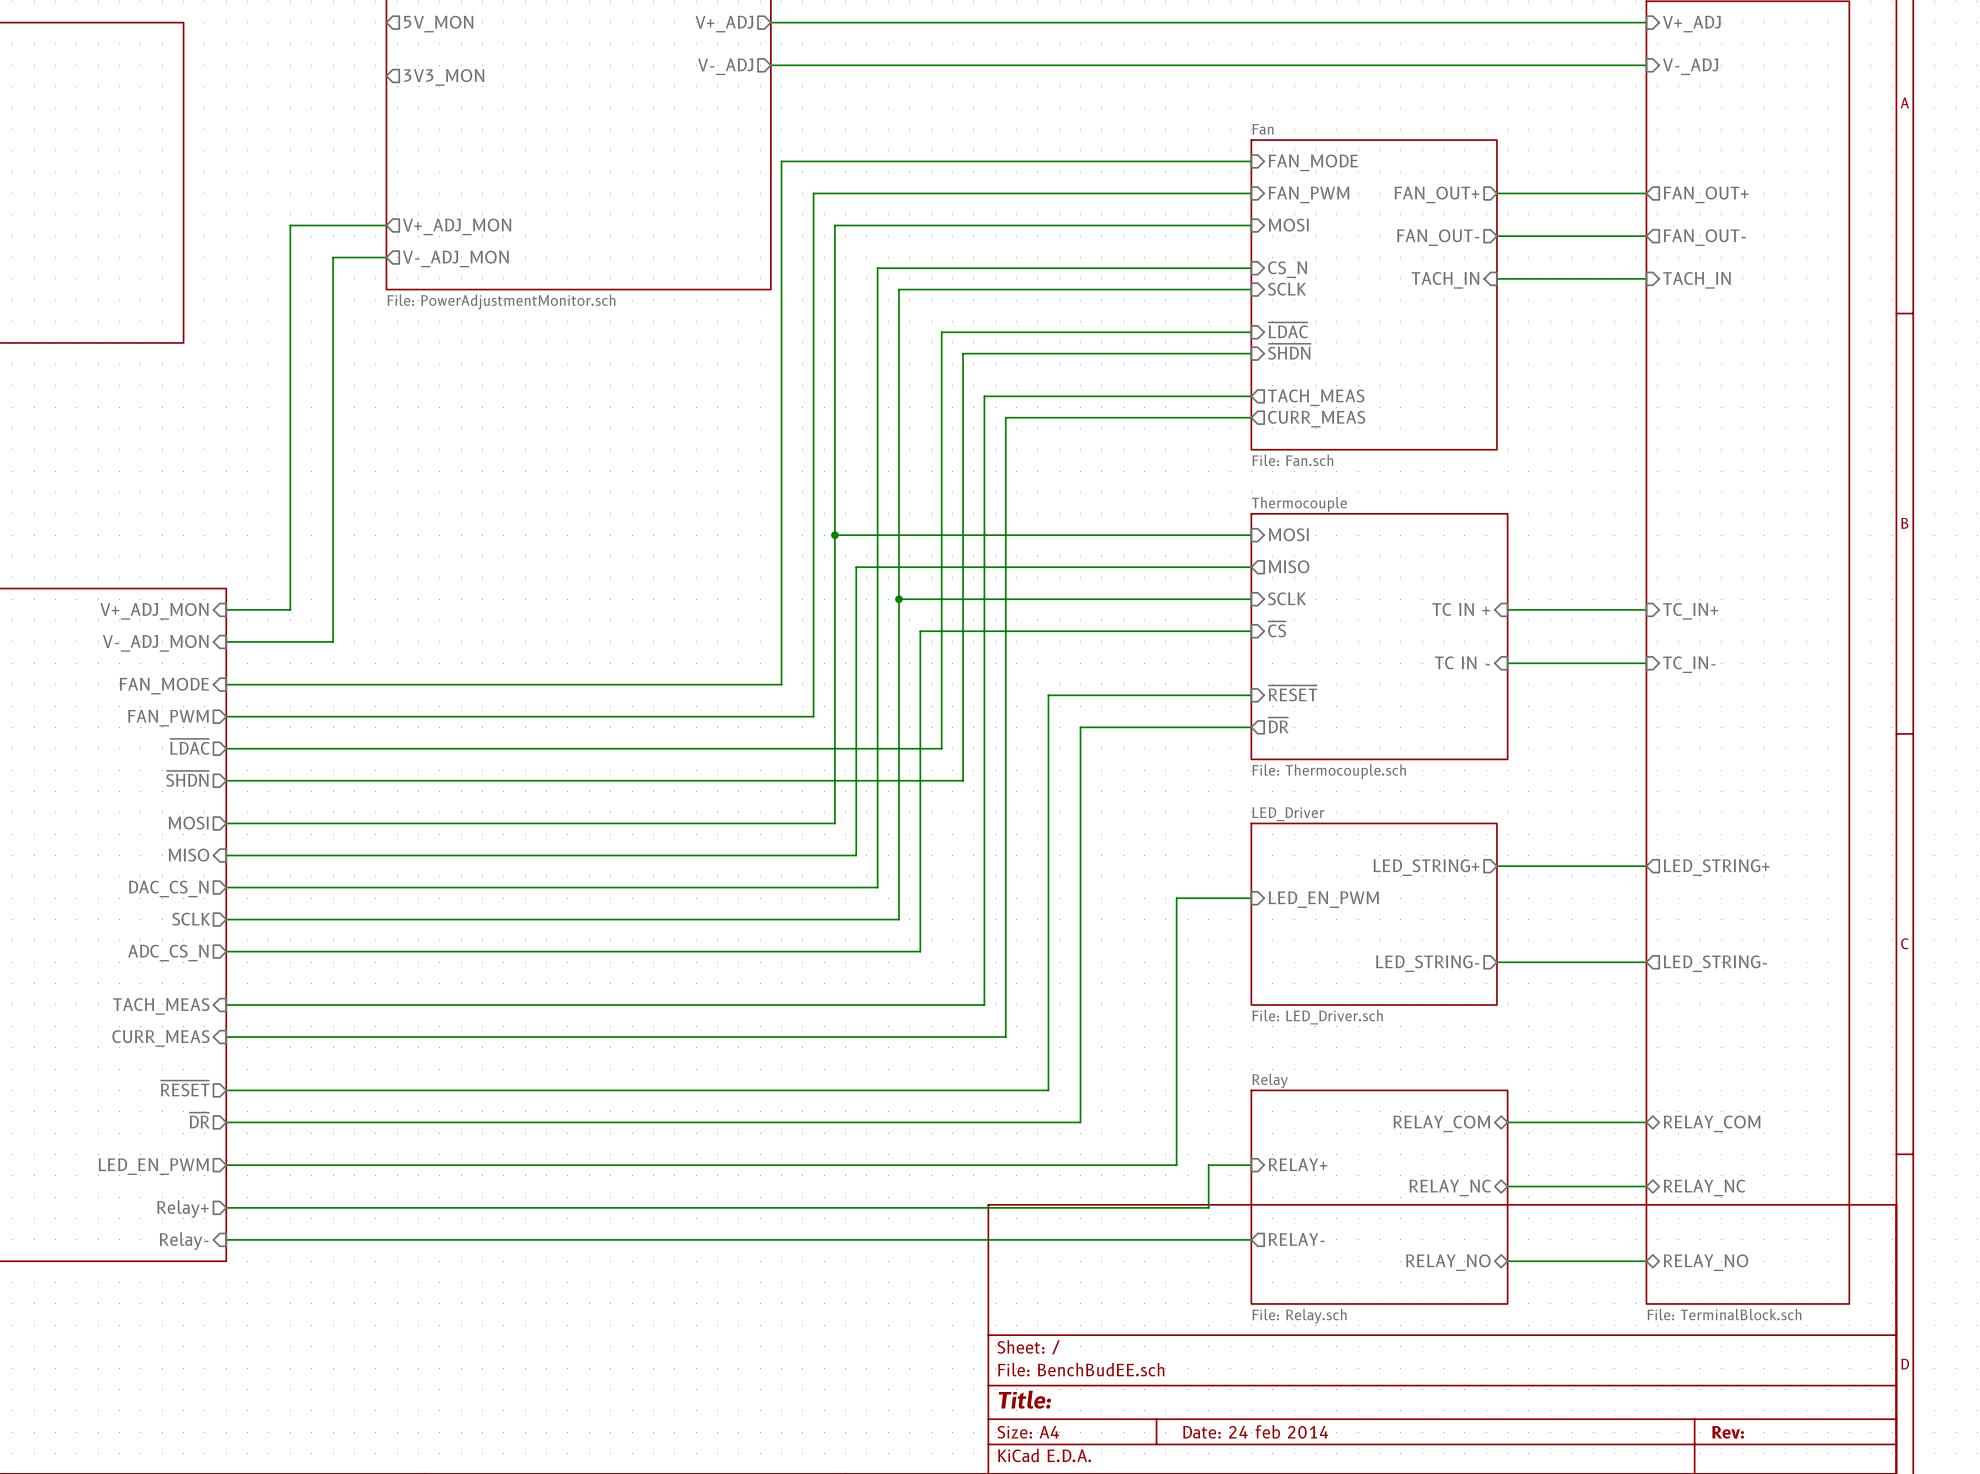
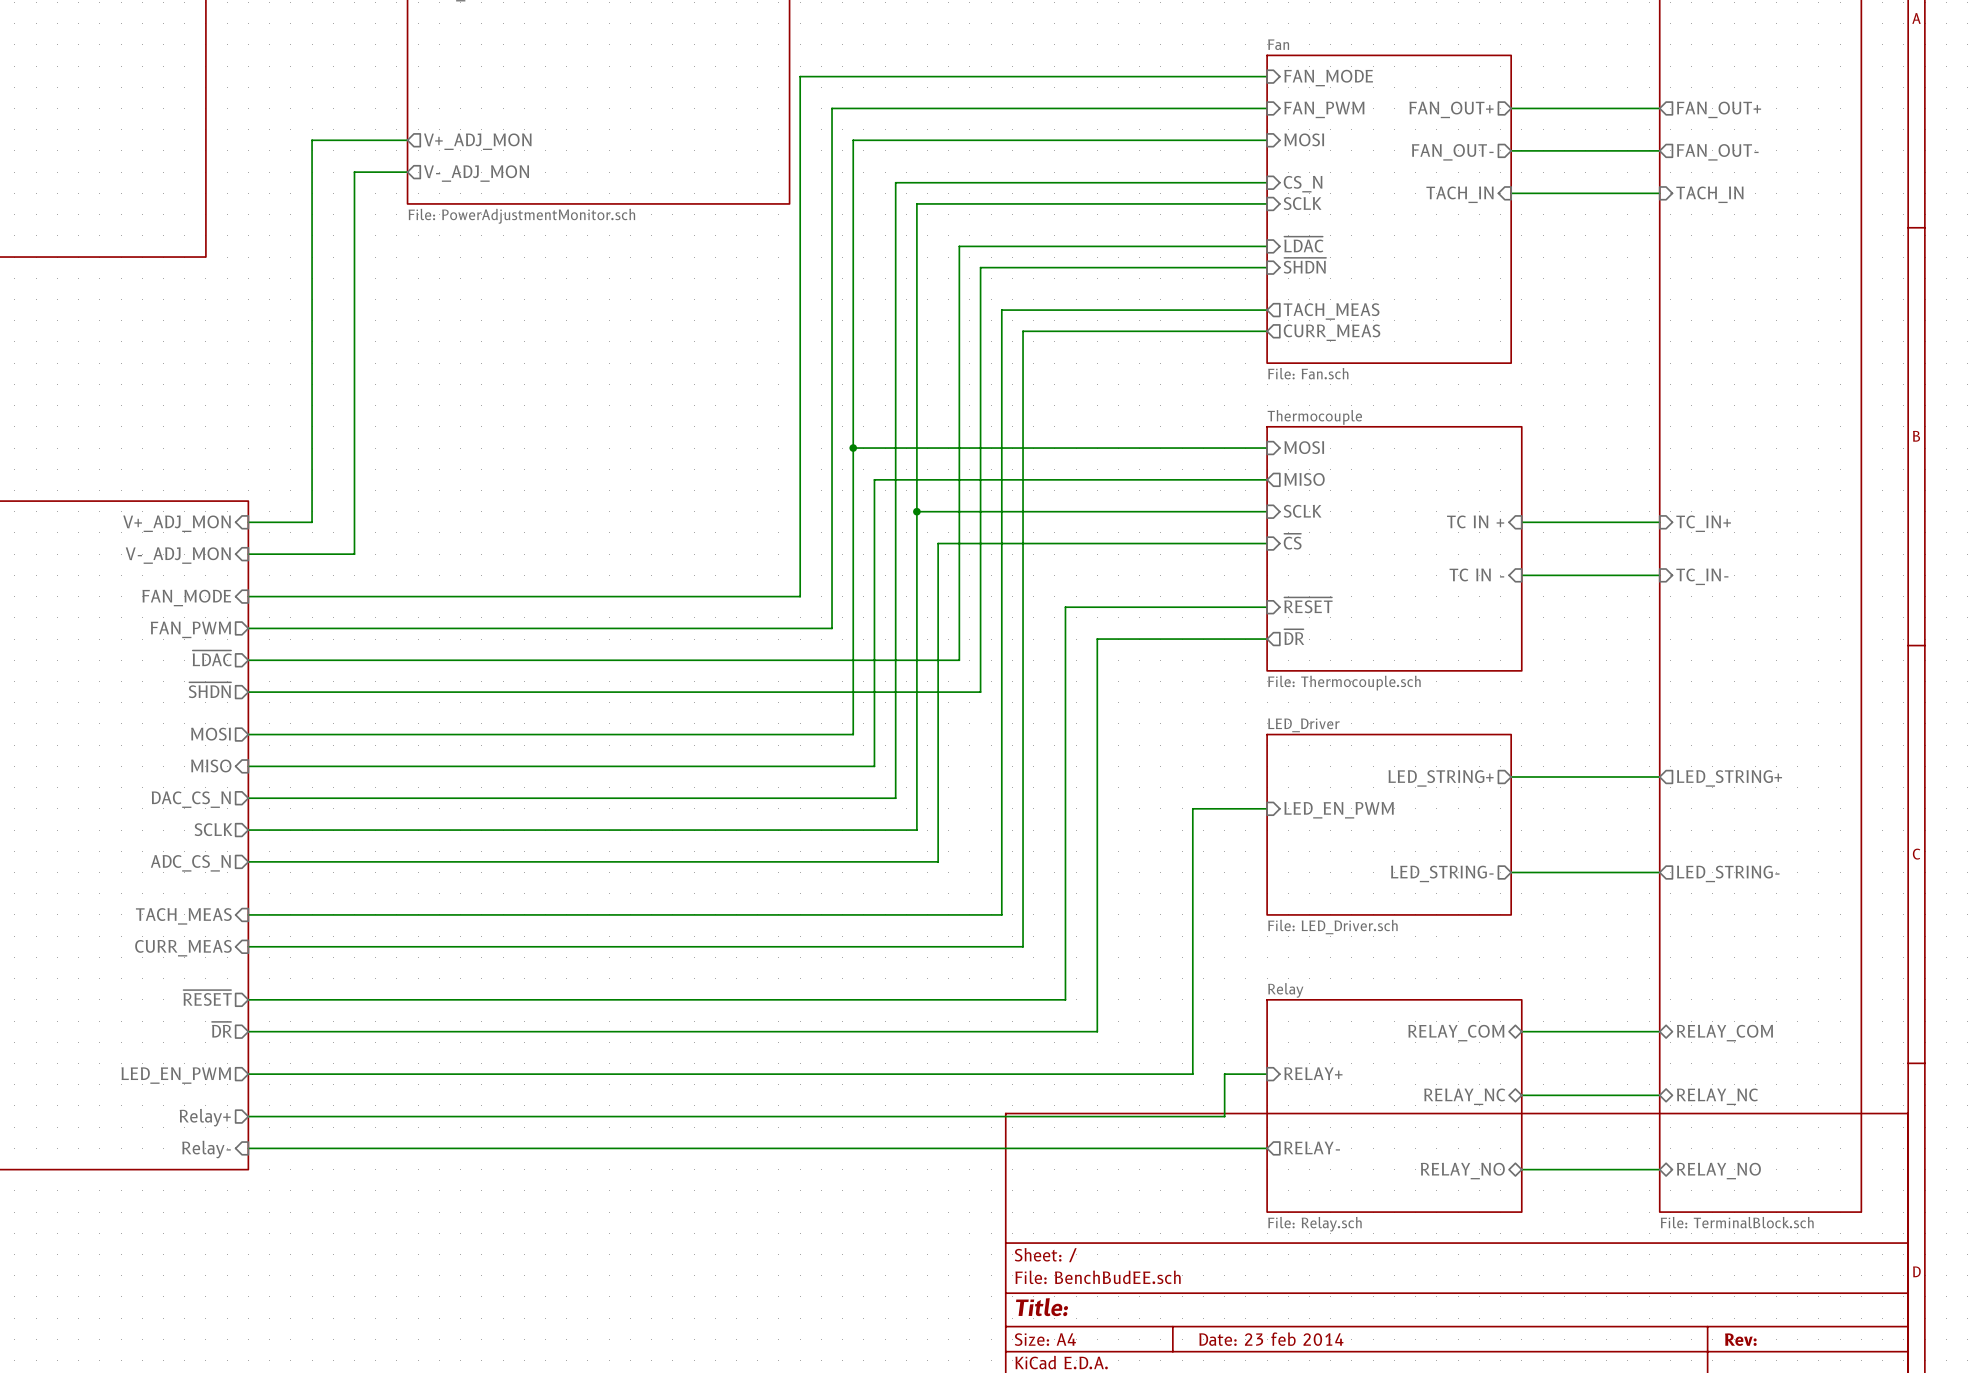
title block: Date: 24 feb 2014 (1255, 1431) -> Date: 23 feb 2014 (1271, 1339)

